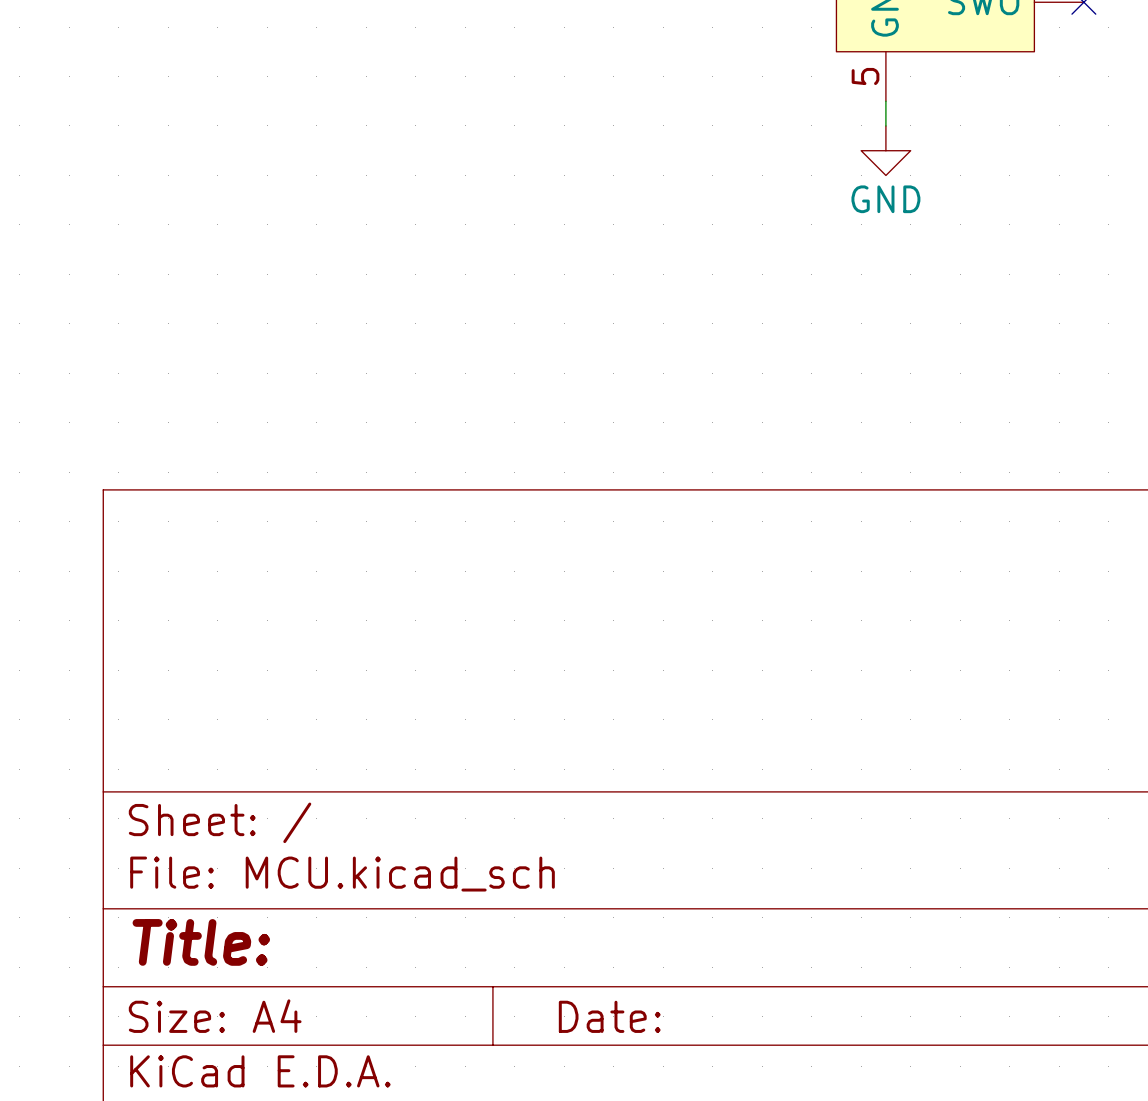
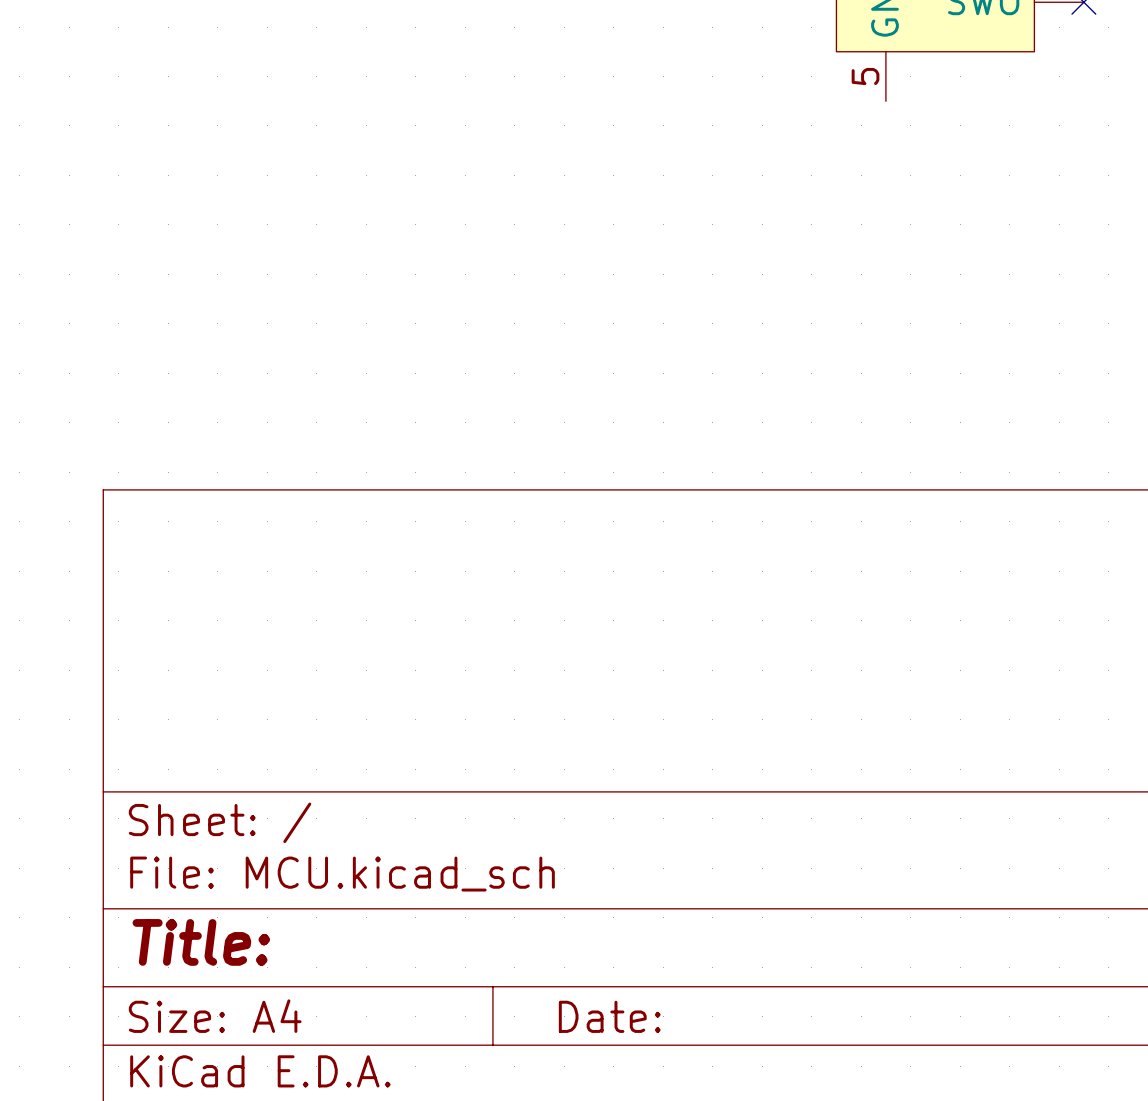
wire: (885, 101) (885, 125) -> none
power symbol: GND (885, 150) -> none

